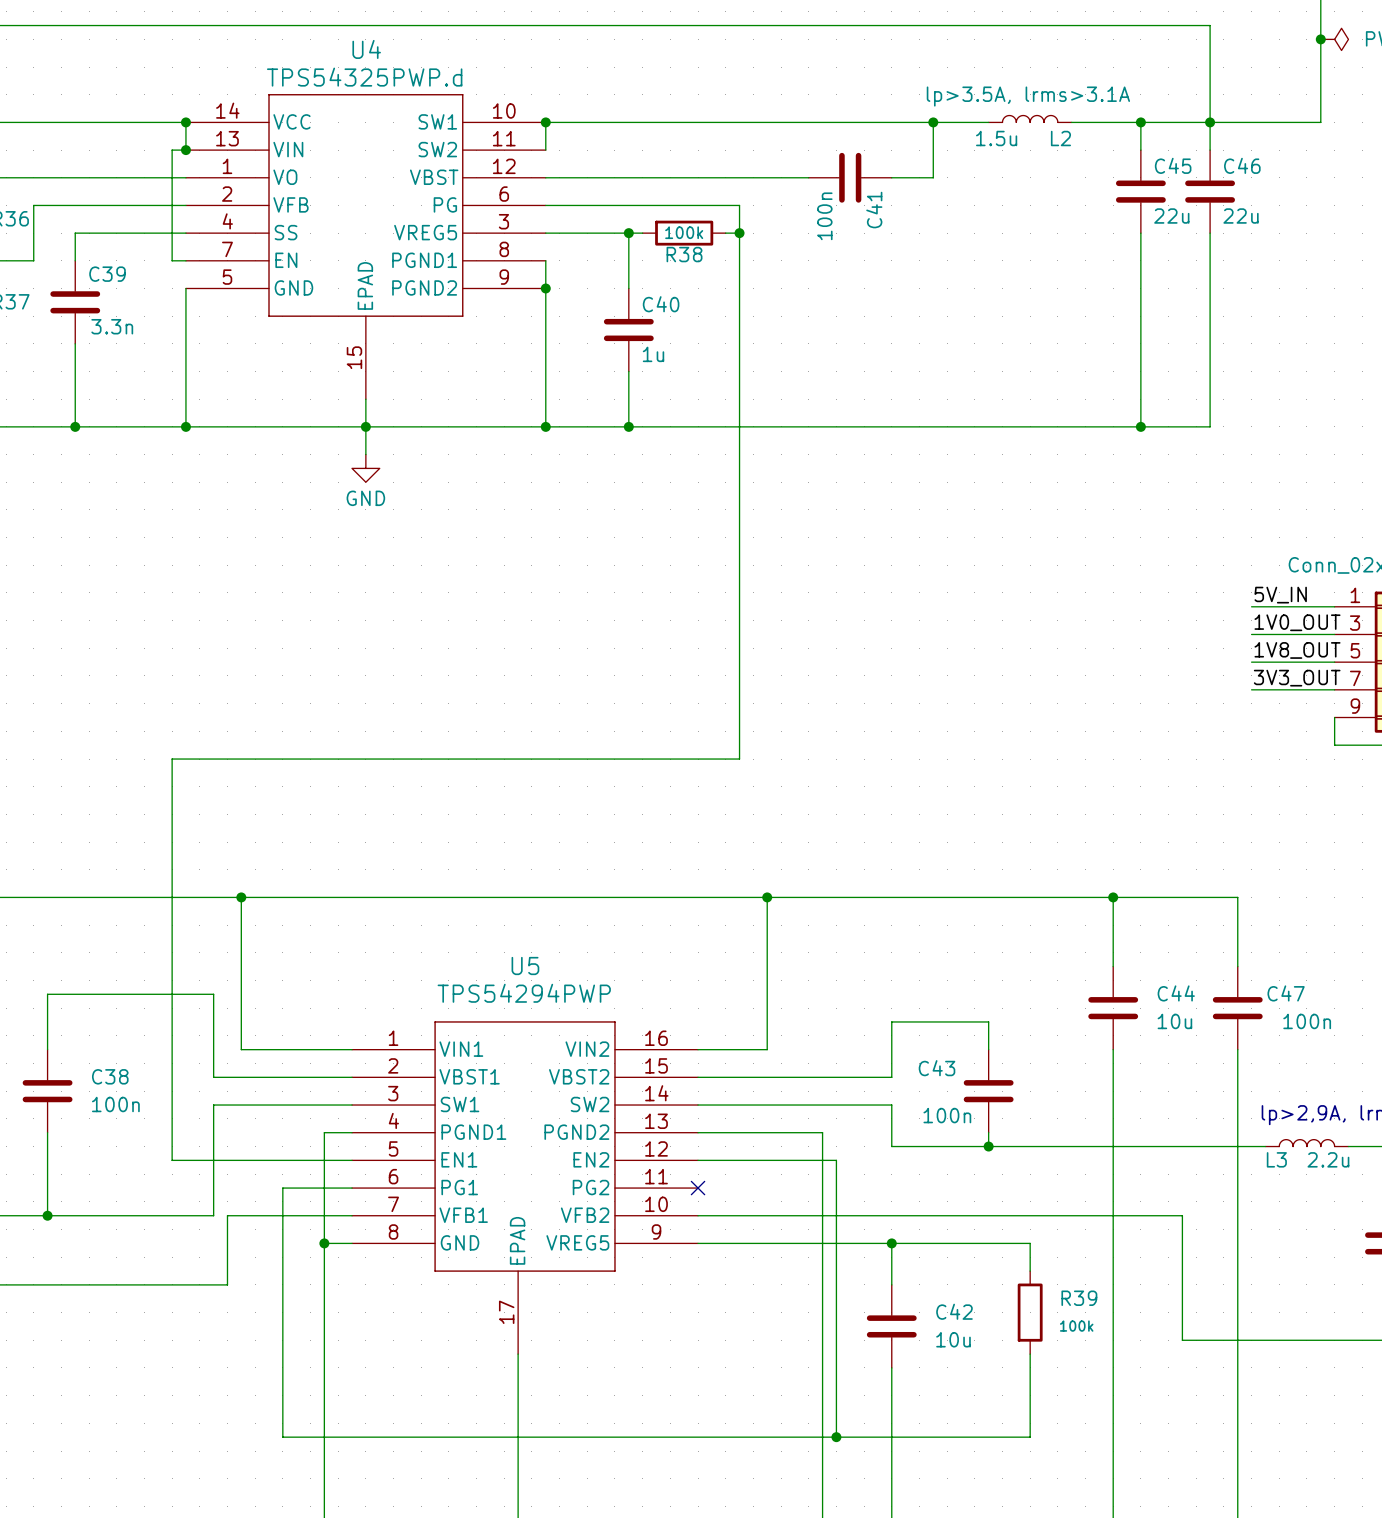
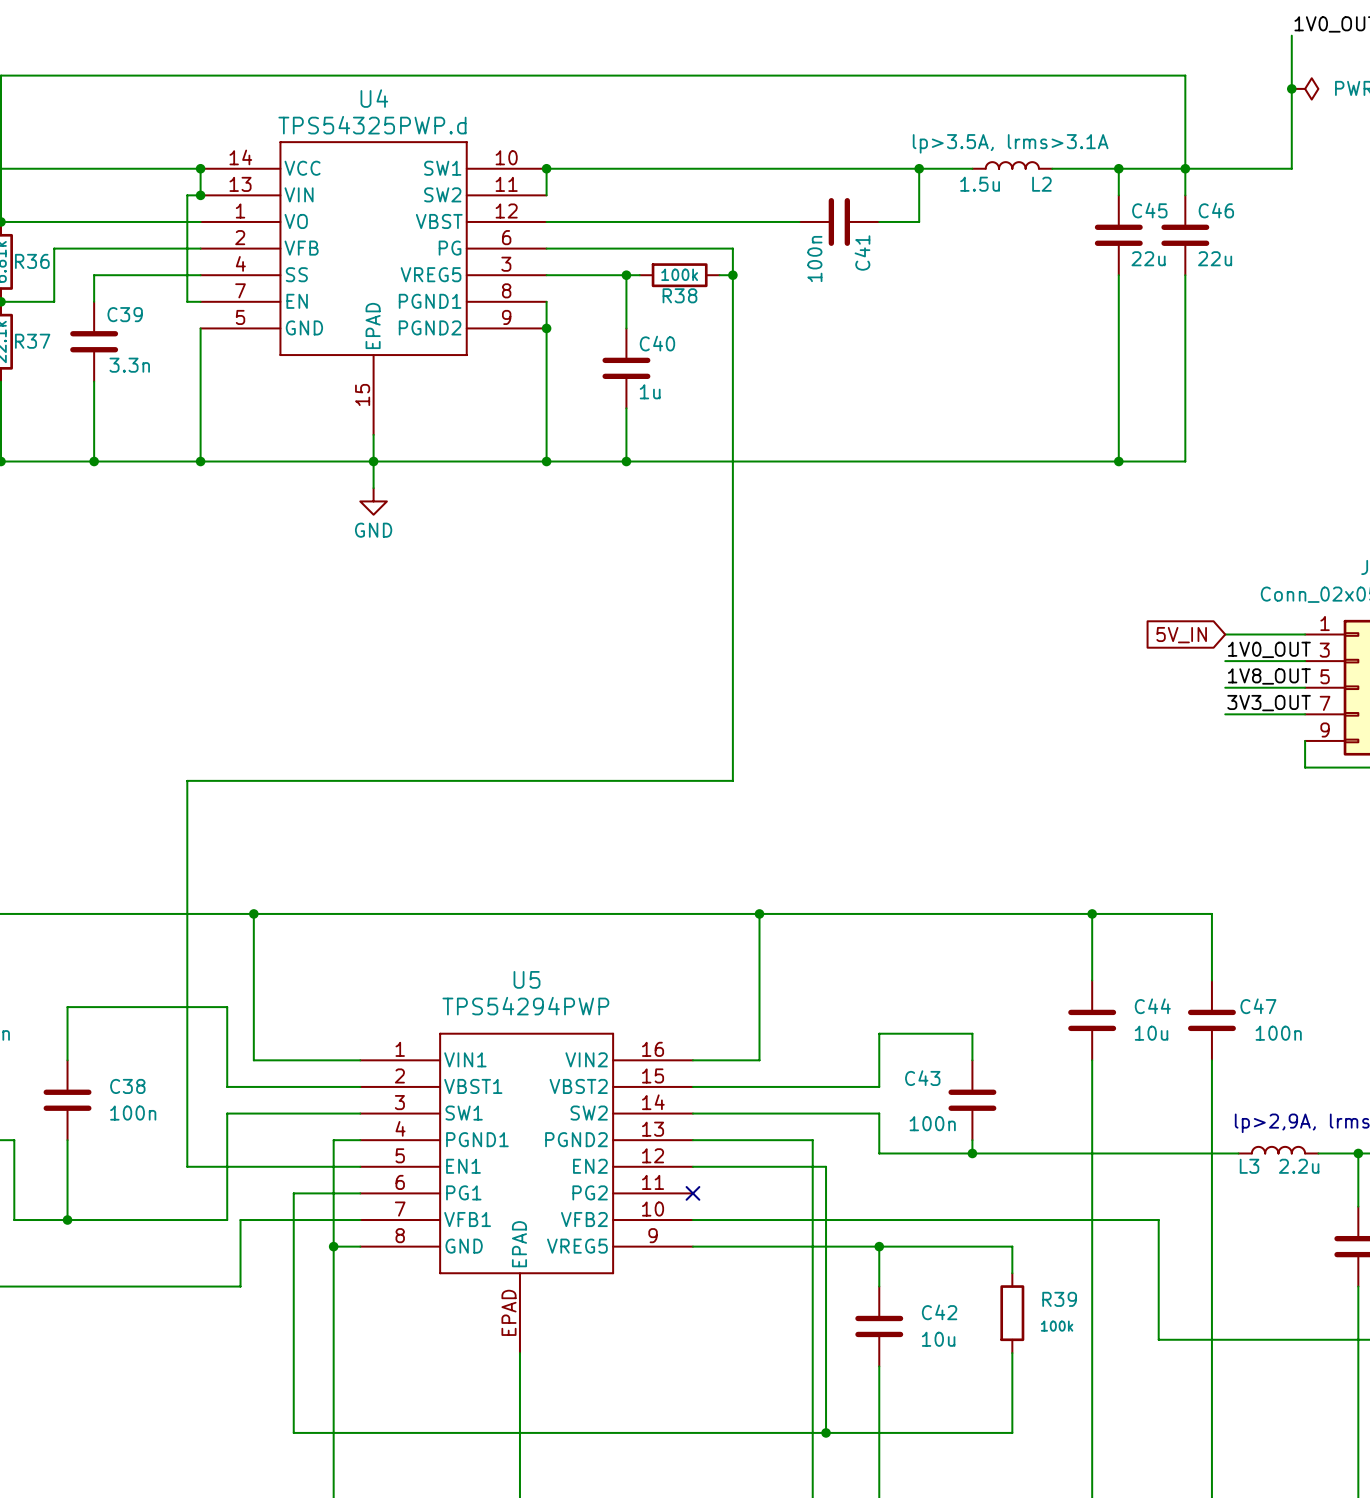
label: 5V_IN (1280, 595) -> none
global label: none -> 5V_IN (1181, 635)
U5 pin number: 17 (506, 1312) -> EPAD (508, 1312)

